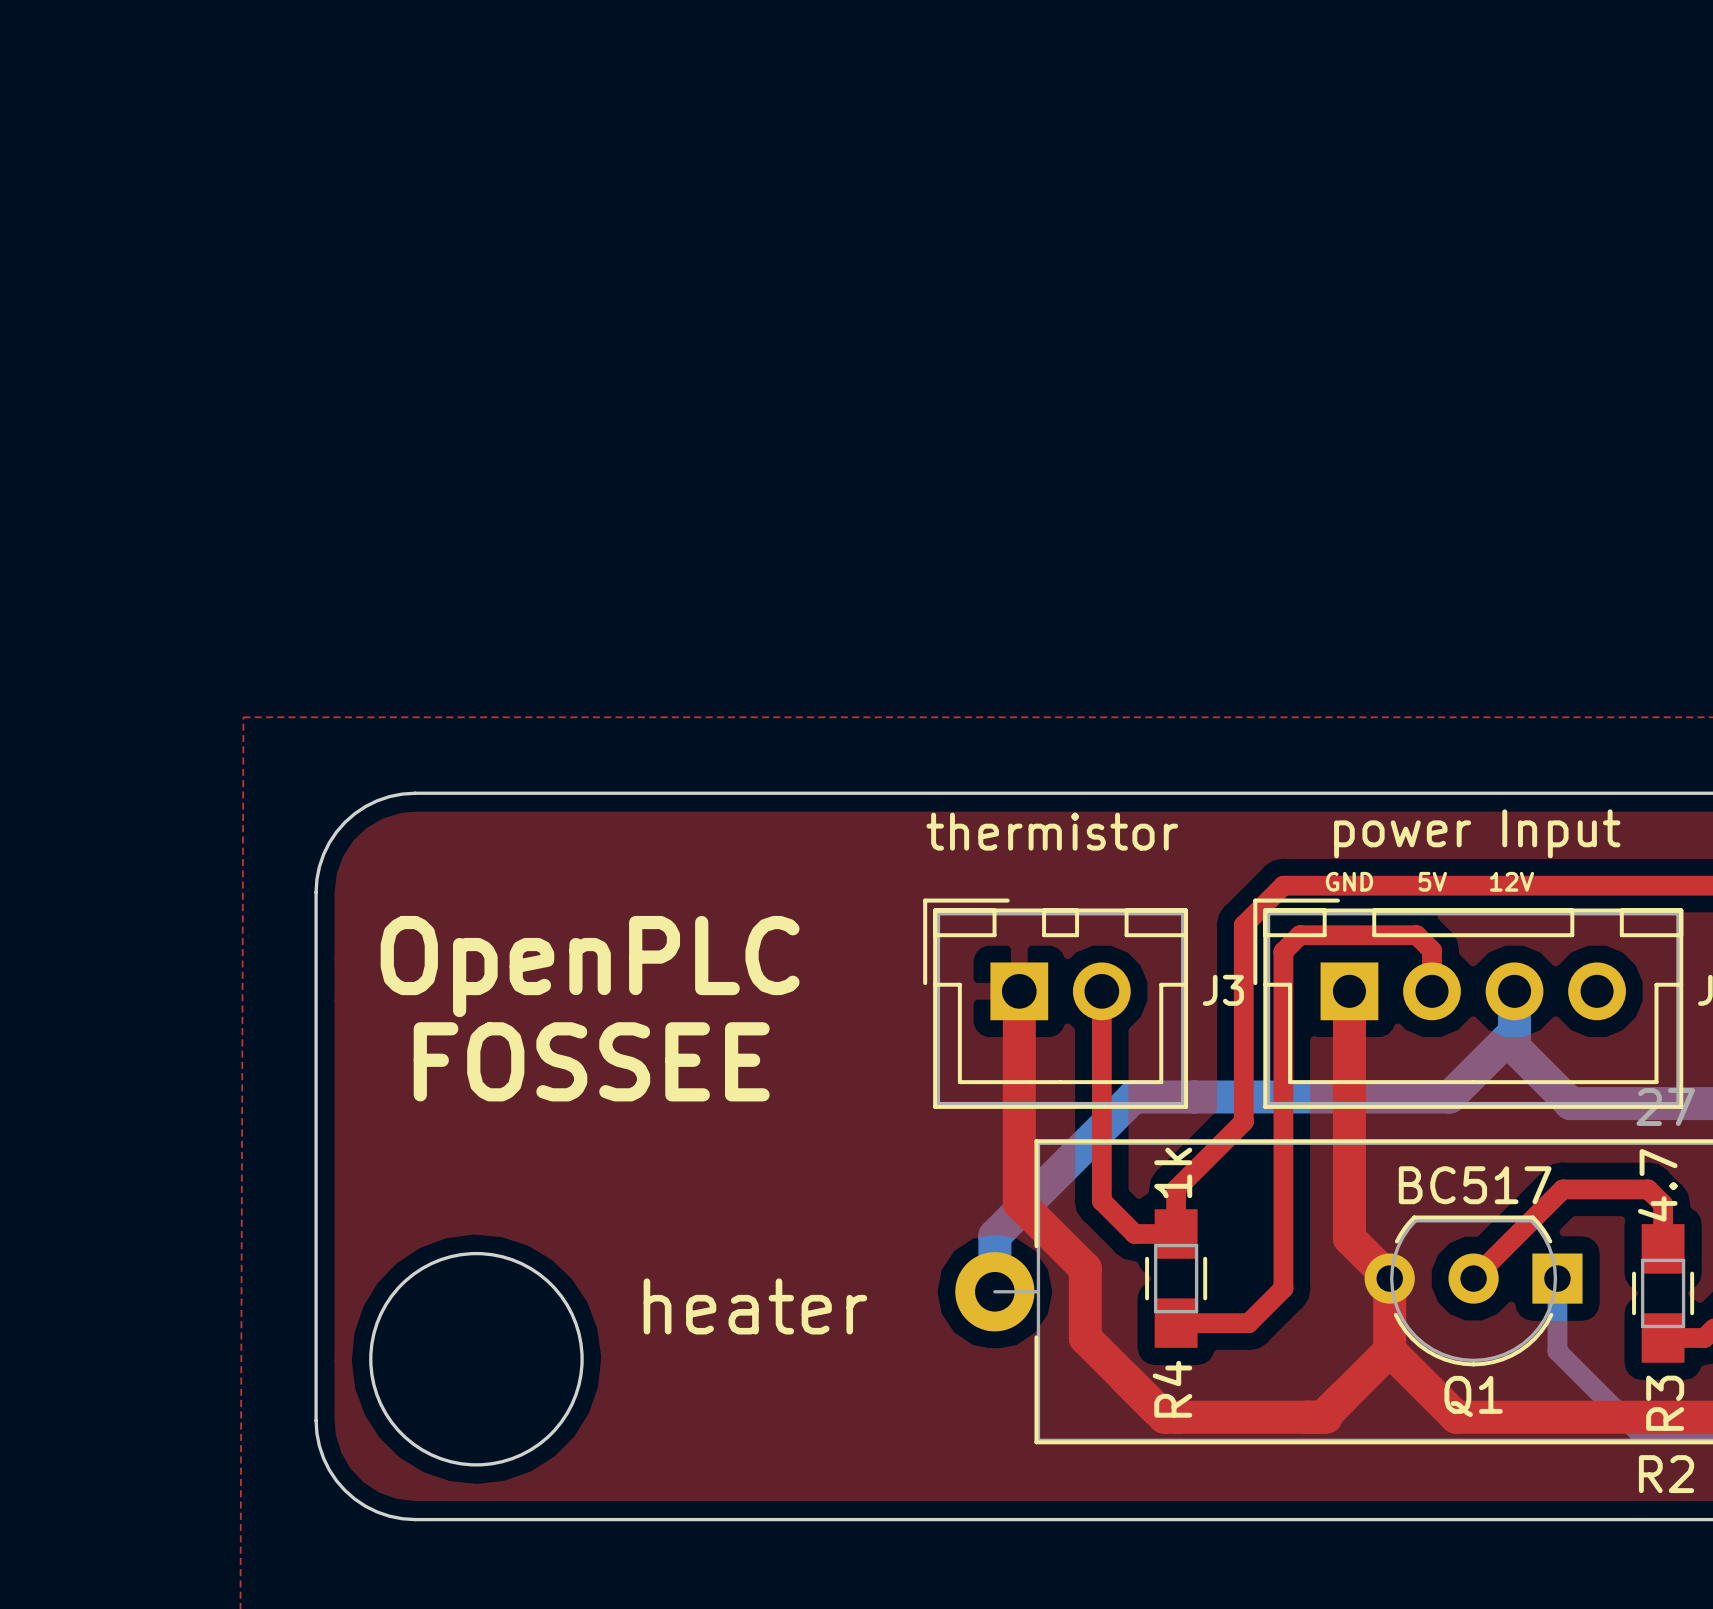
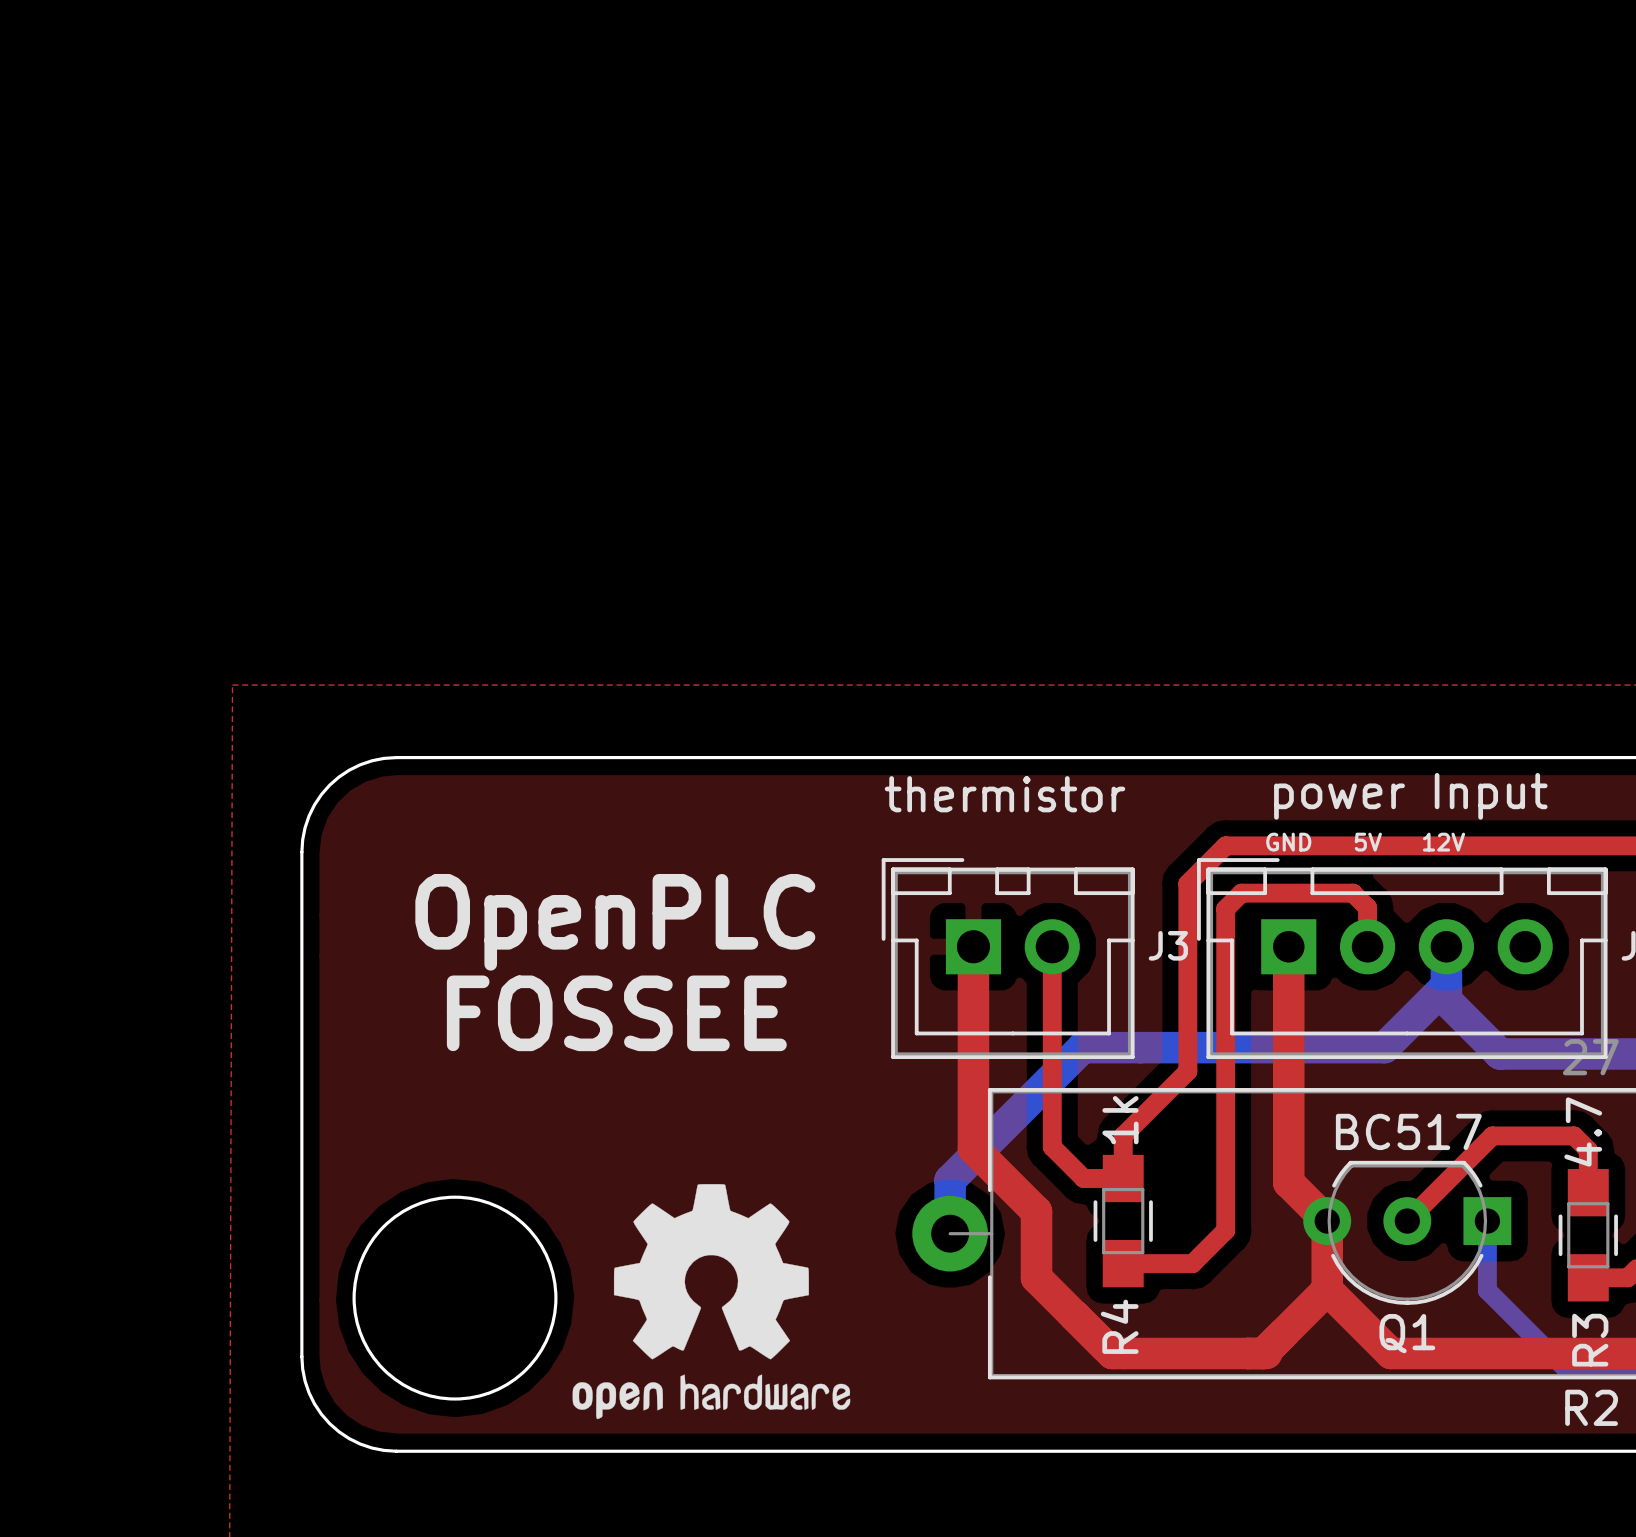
text position: OpenPLC (590, 966) -> OpenPLC (615, 922)
text position: FOSSEE (591, 1061) -> FOSSEE (616, 1013)
drawing: none -> [572, 1184, 851, 1420]
text: heater (755, 1306) -> none

